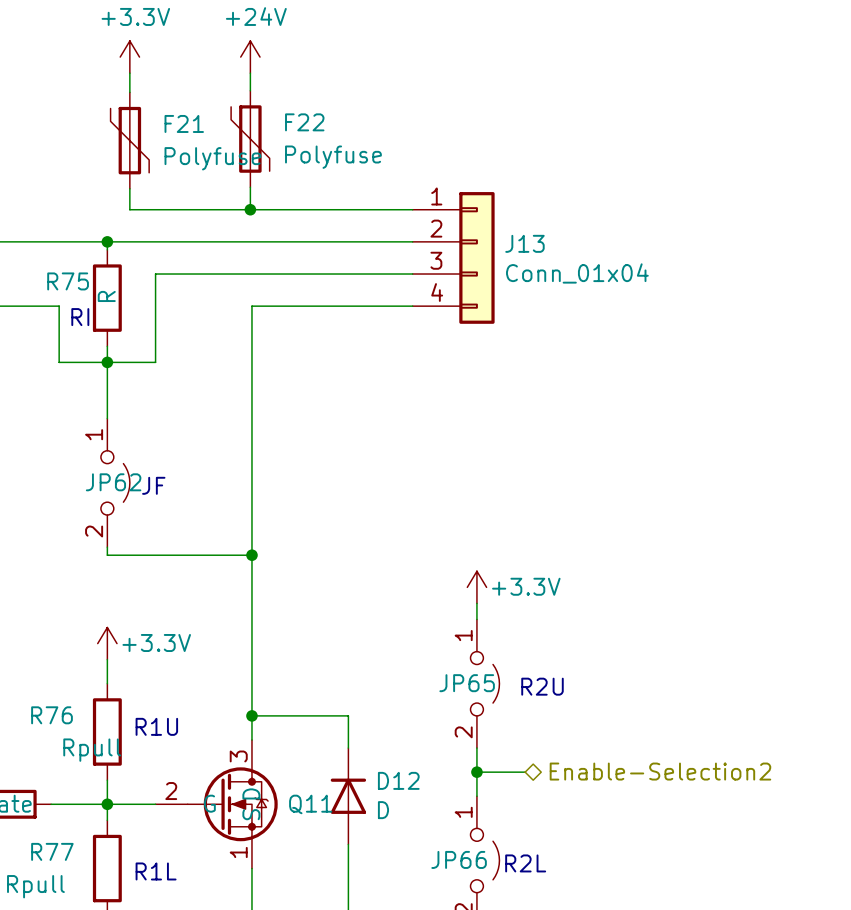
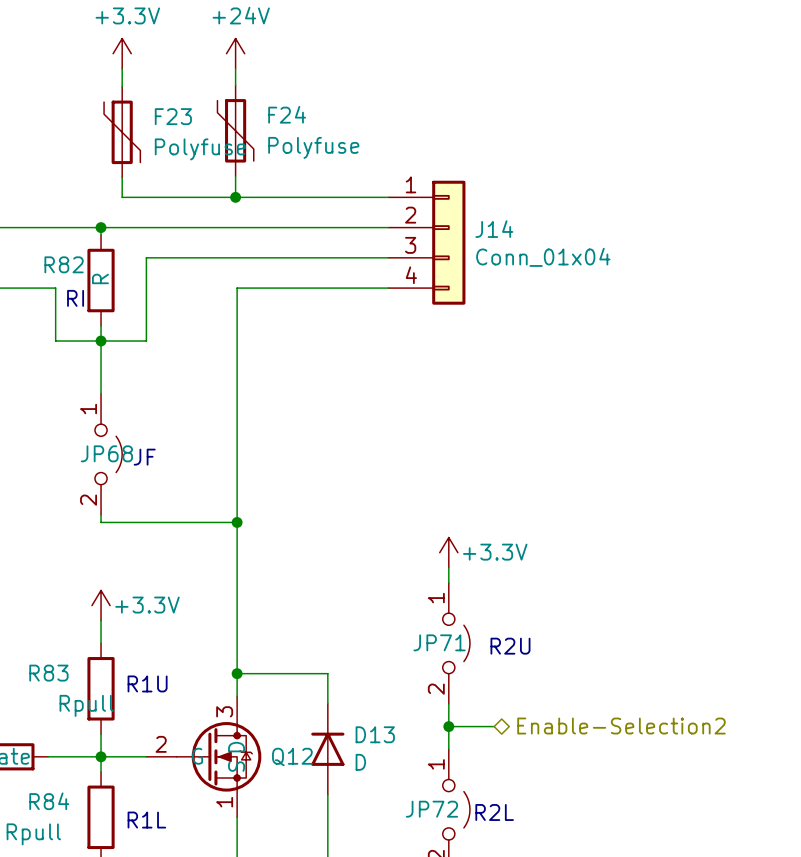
F22 name: F22 (304, 122) -> F24 (287, 114)
F21 name: F21 (184, 123) -> F23 (173, 116)
J13 name: J13 (524, 243) -> J14 (494, 229)
R75 name: R75 (68, 281) -> R82 (64, 264)
JP62 name: JP62 (113, 482) -> JP68 (106, 453)
JP65 name: JP65 (467, 683) -> JP71 (439, 642)
R76 name: R76 (52, 715) -> R83 (48, 673)
D12 name: D12 (398, 780) -> D13 (375, 734)
Q11 name: Q11 (310, 804) -> Q12 (292, 756)
R77 name: R77 (52, 851) -> R84 (49, 801)
JP66 name: JP66 (459, 859) -> JP72 (432, 809)

